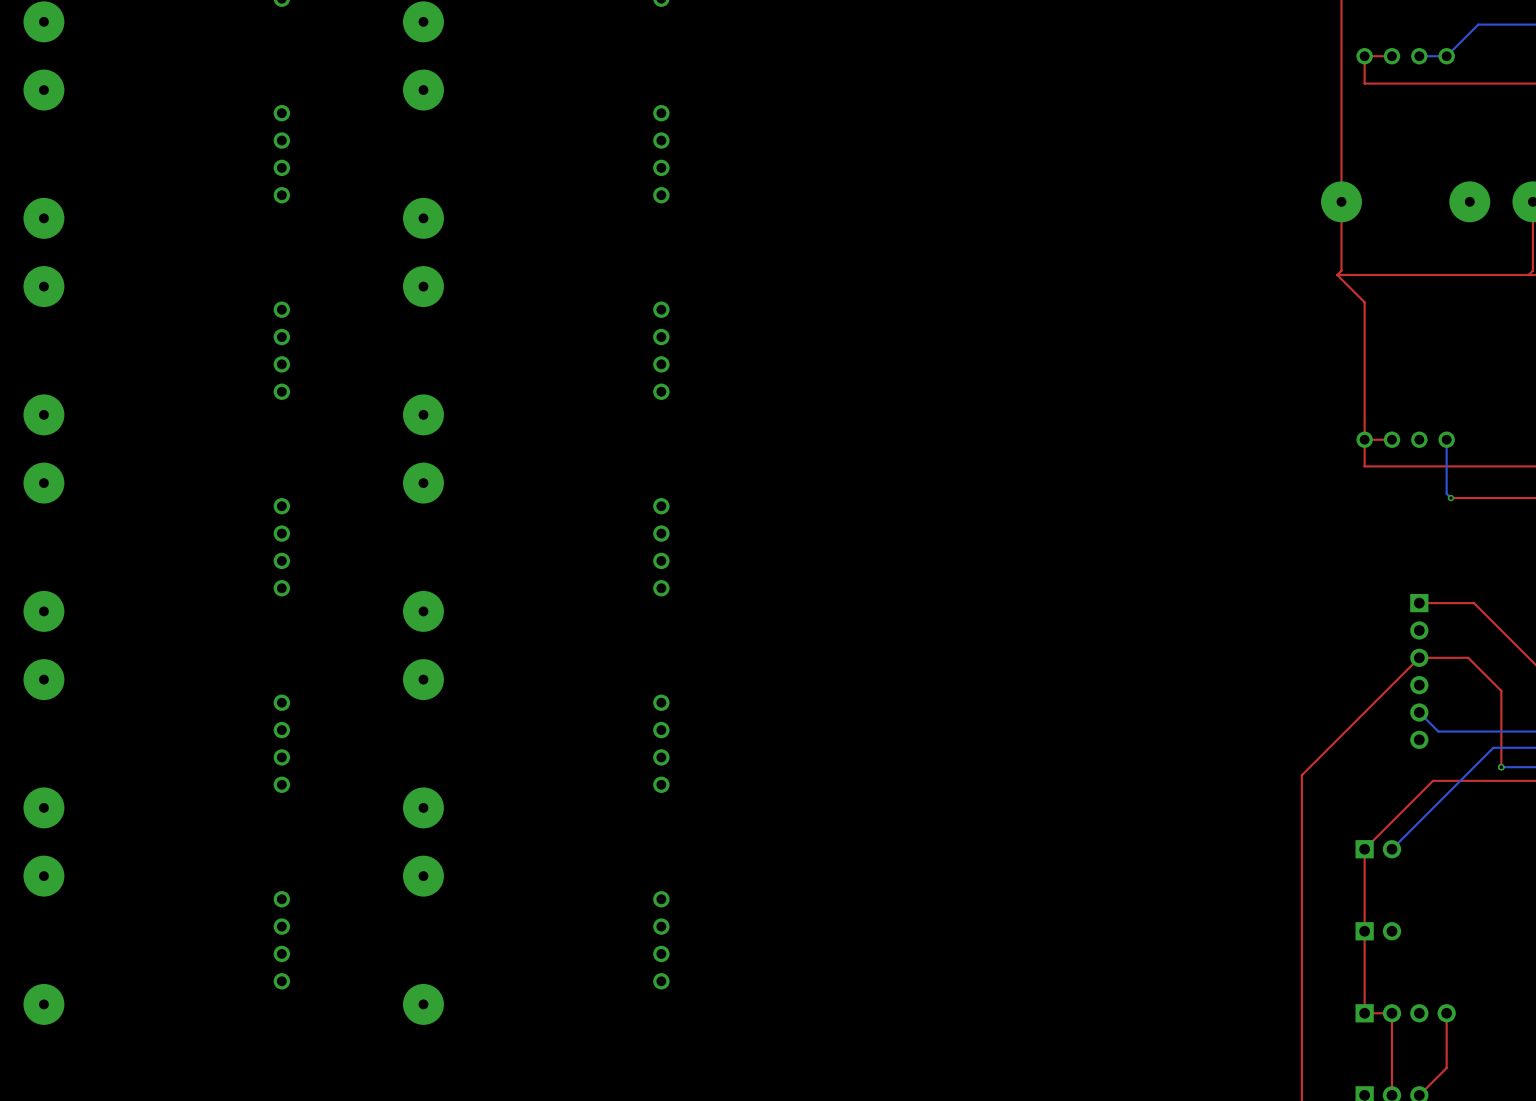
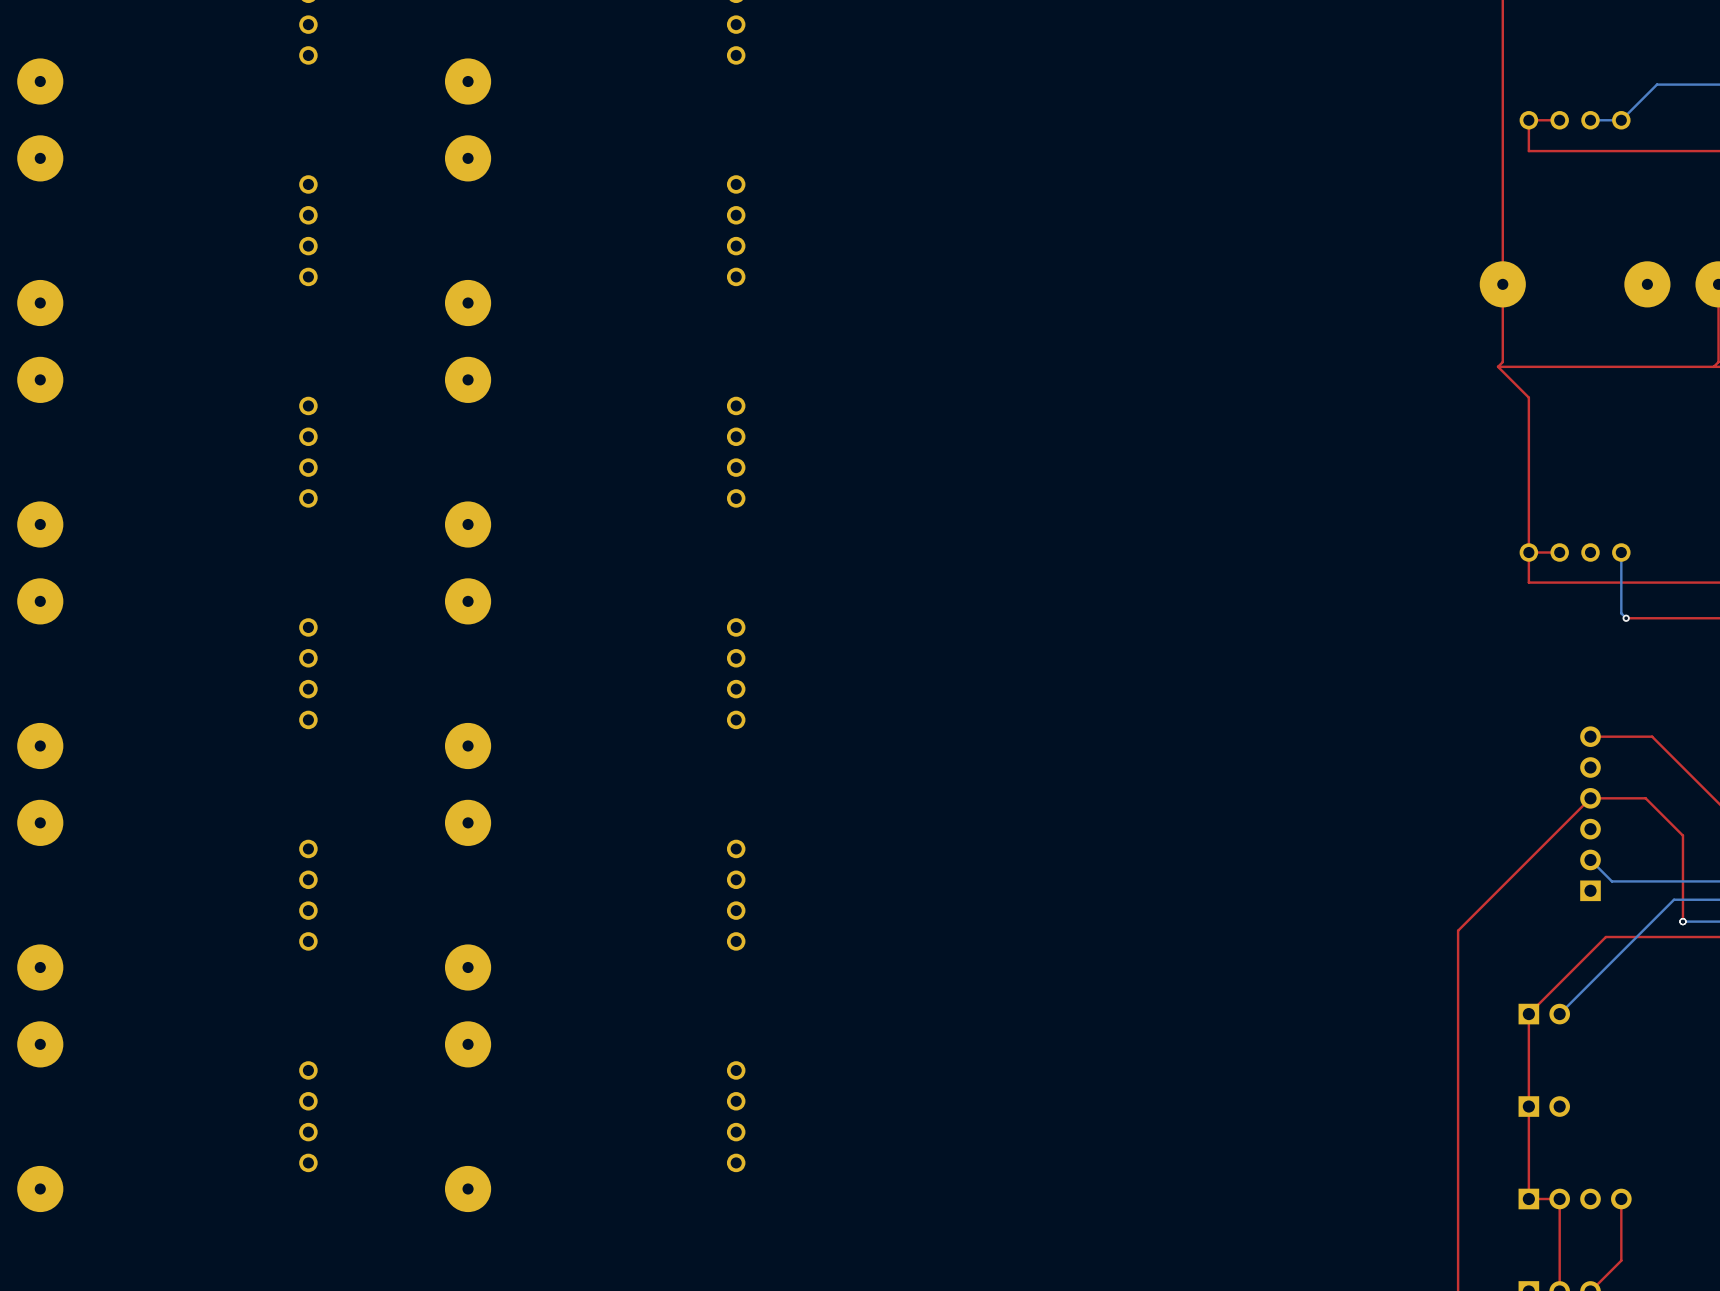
part rotation: 0° (1419, 671) -> 180° (1590, 813)

